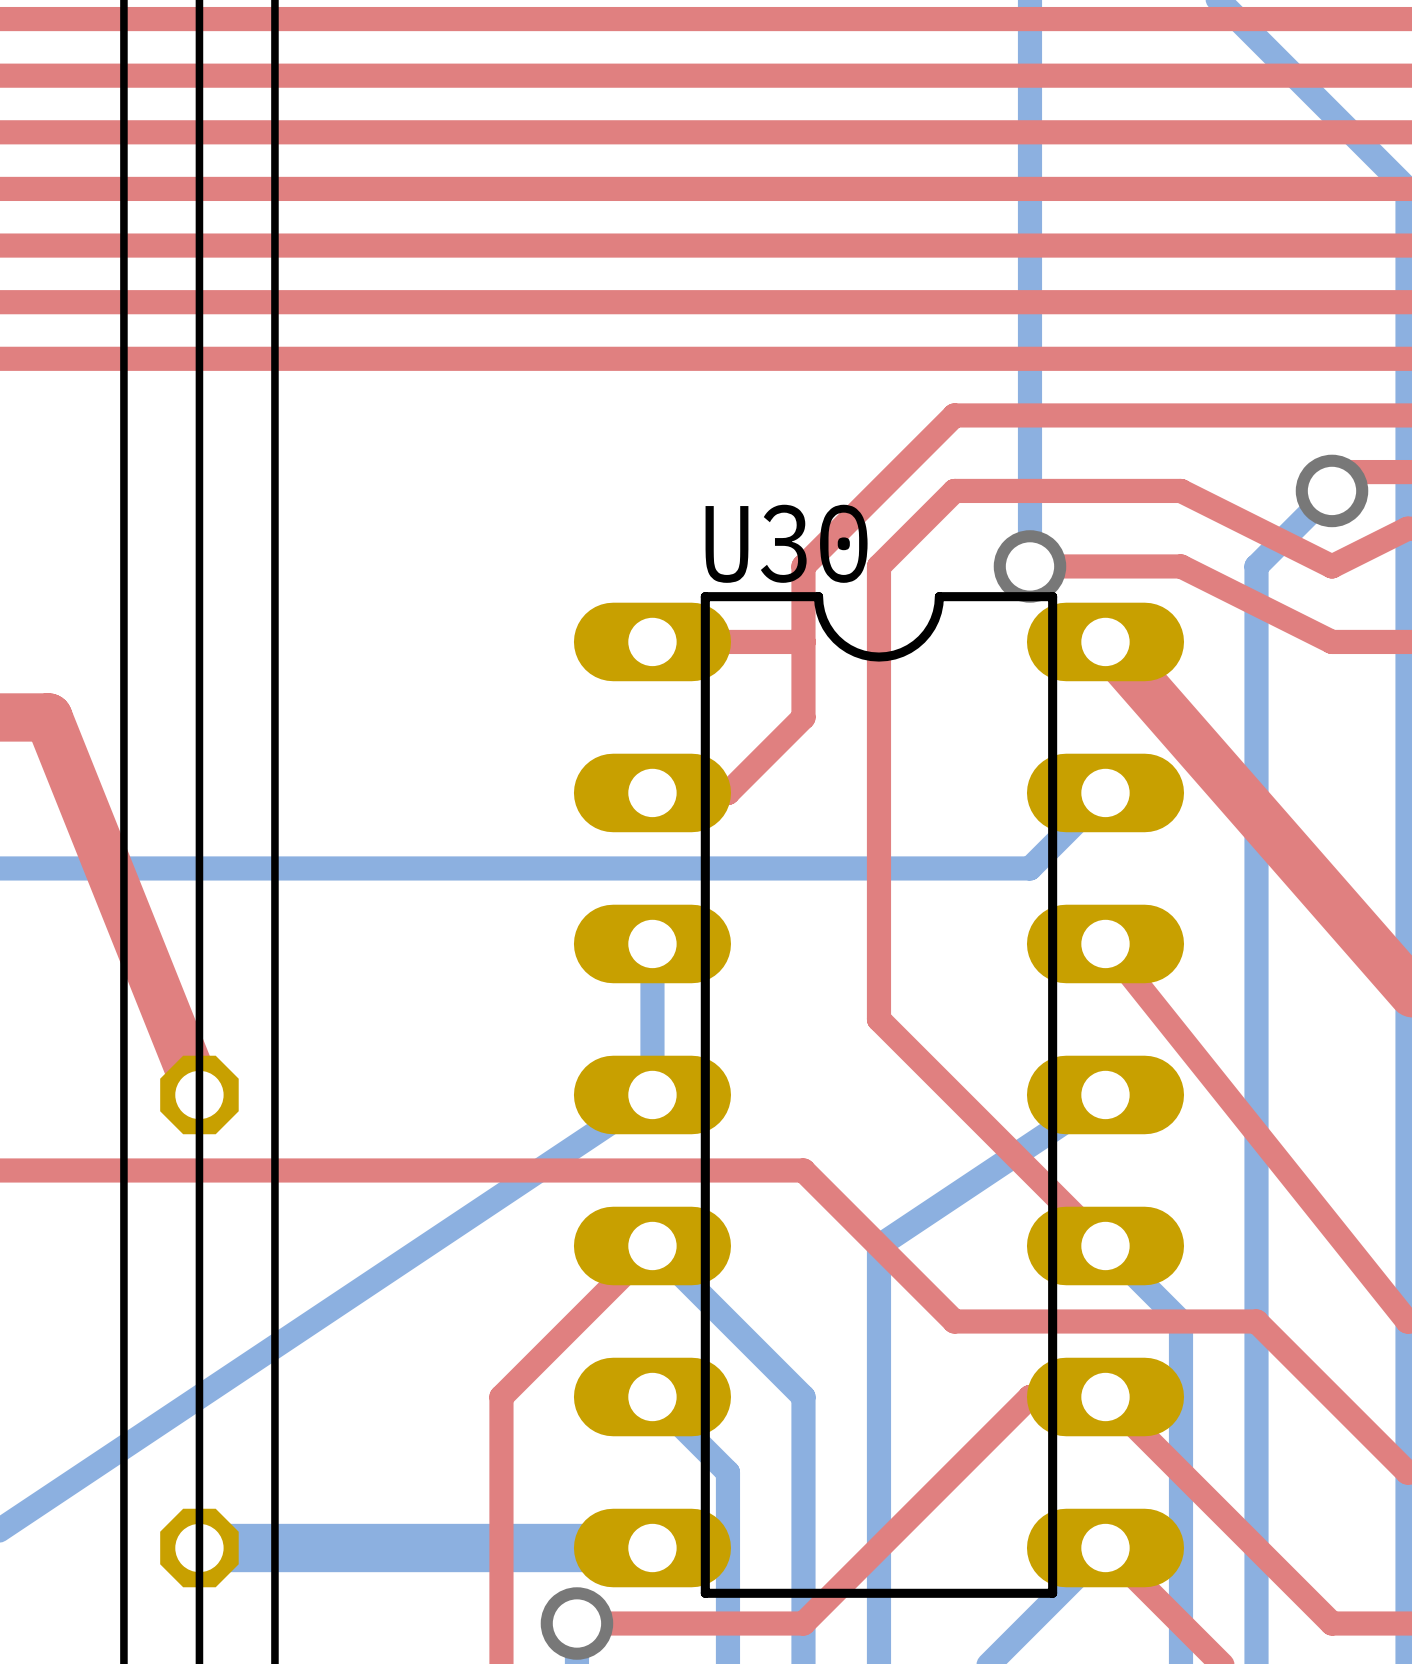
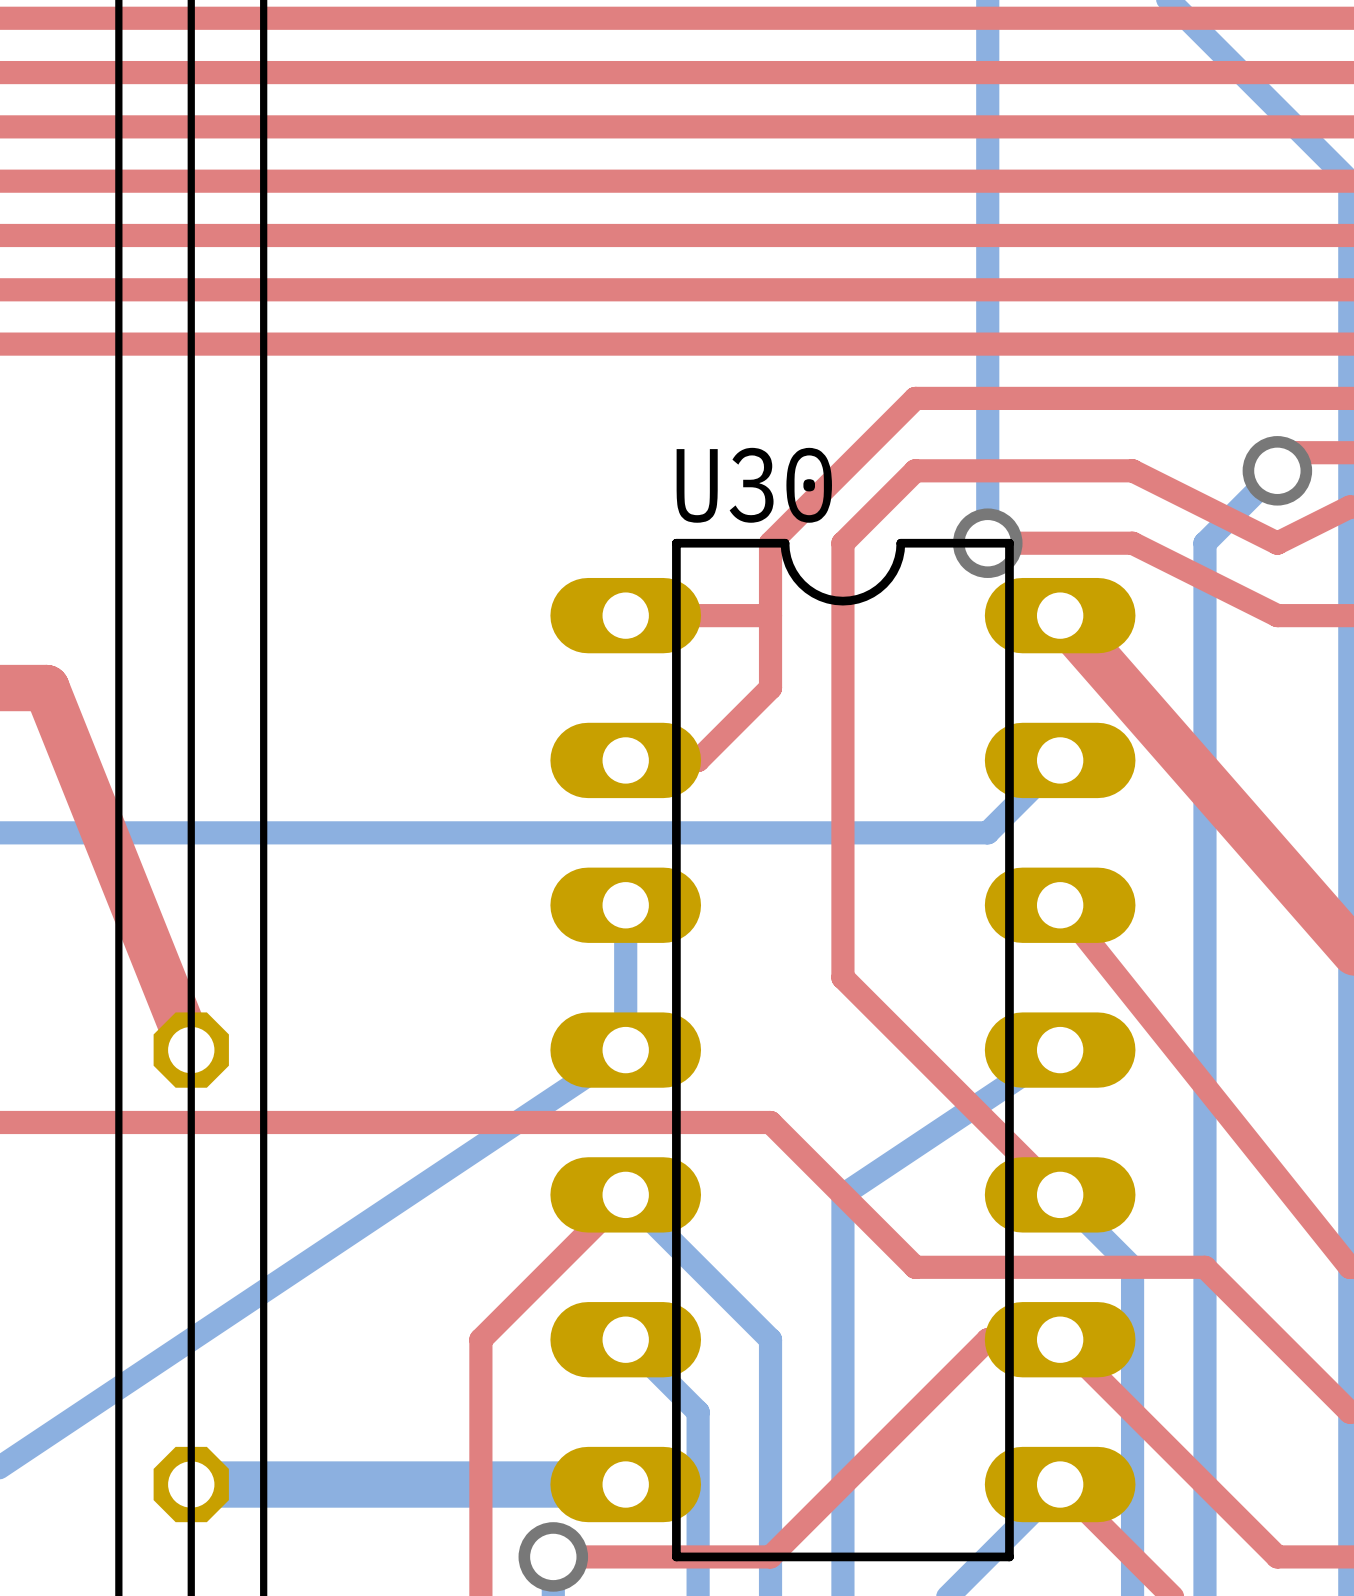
U30 name position: U30 (786, 543) -> U30 (754, 485)
U30 footprint: [573, 592, 1185, 1598] -> [550, 538, 1136, 1562]

